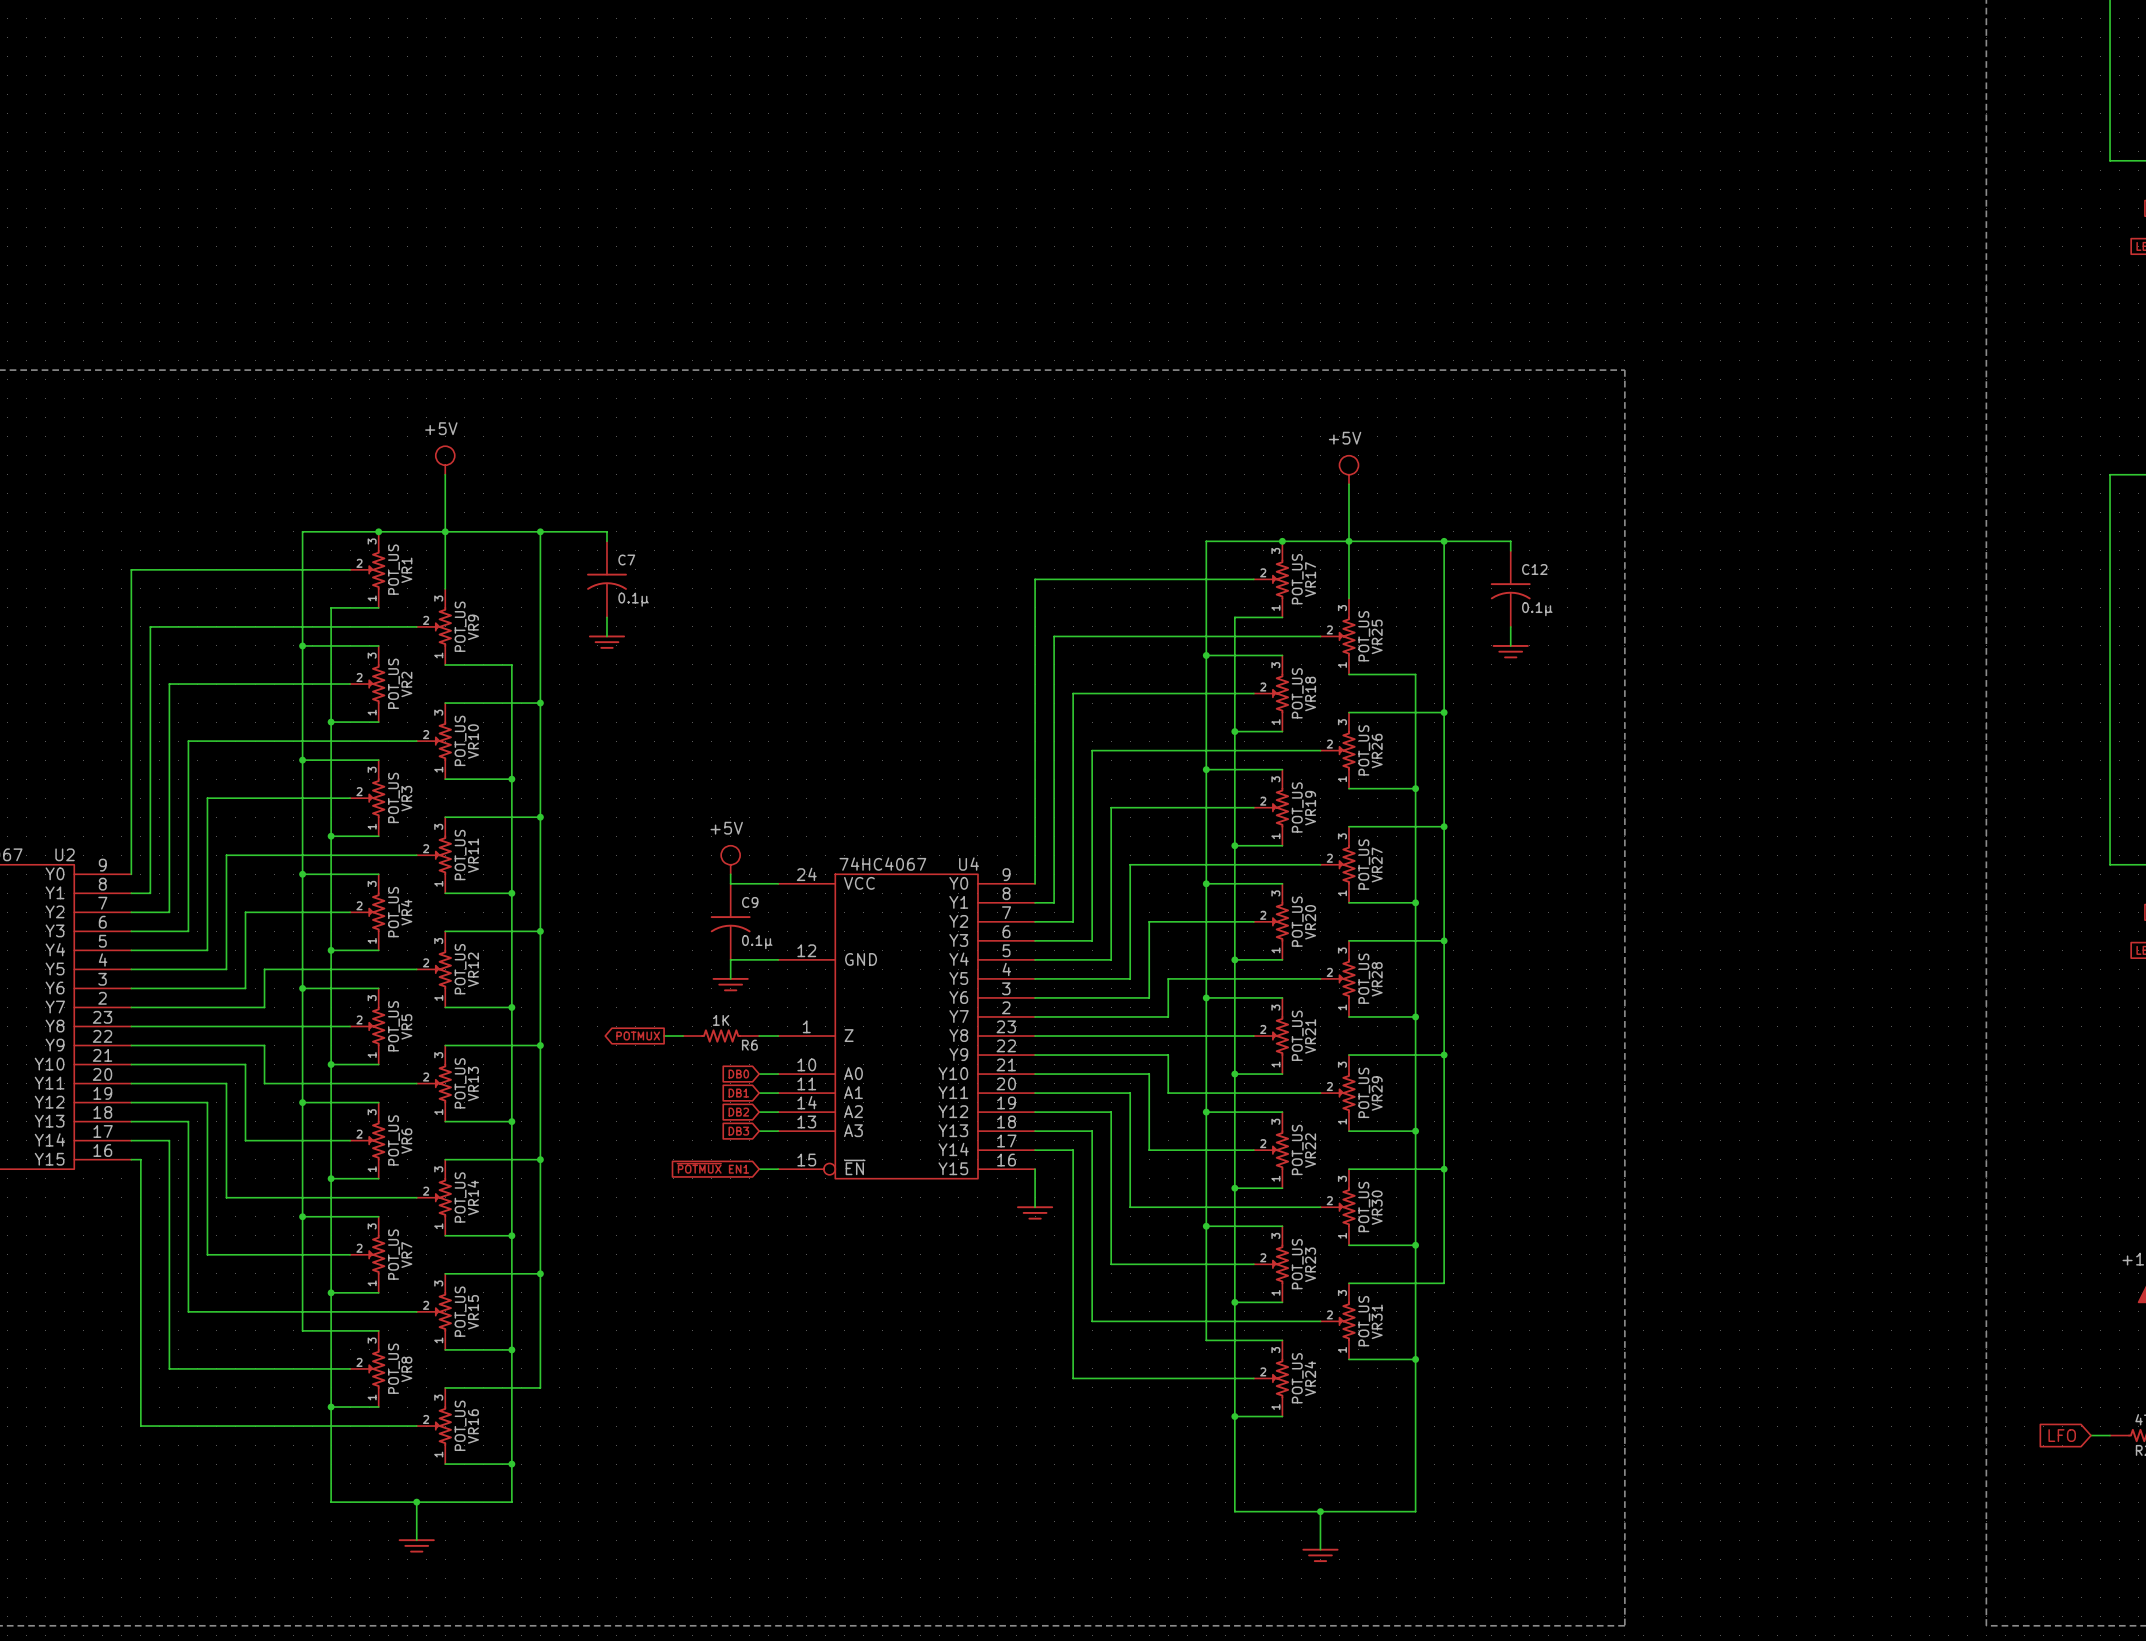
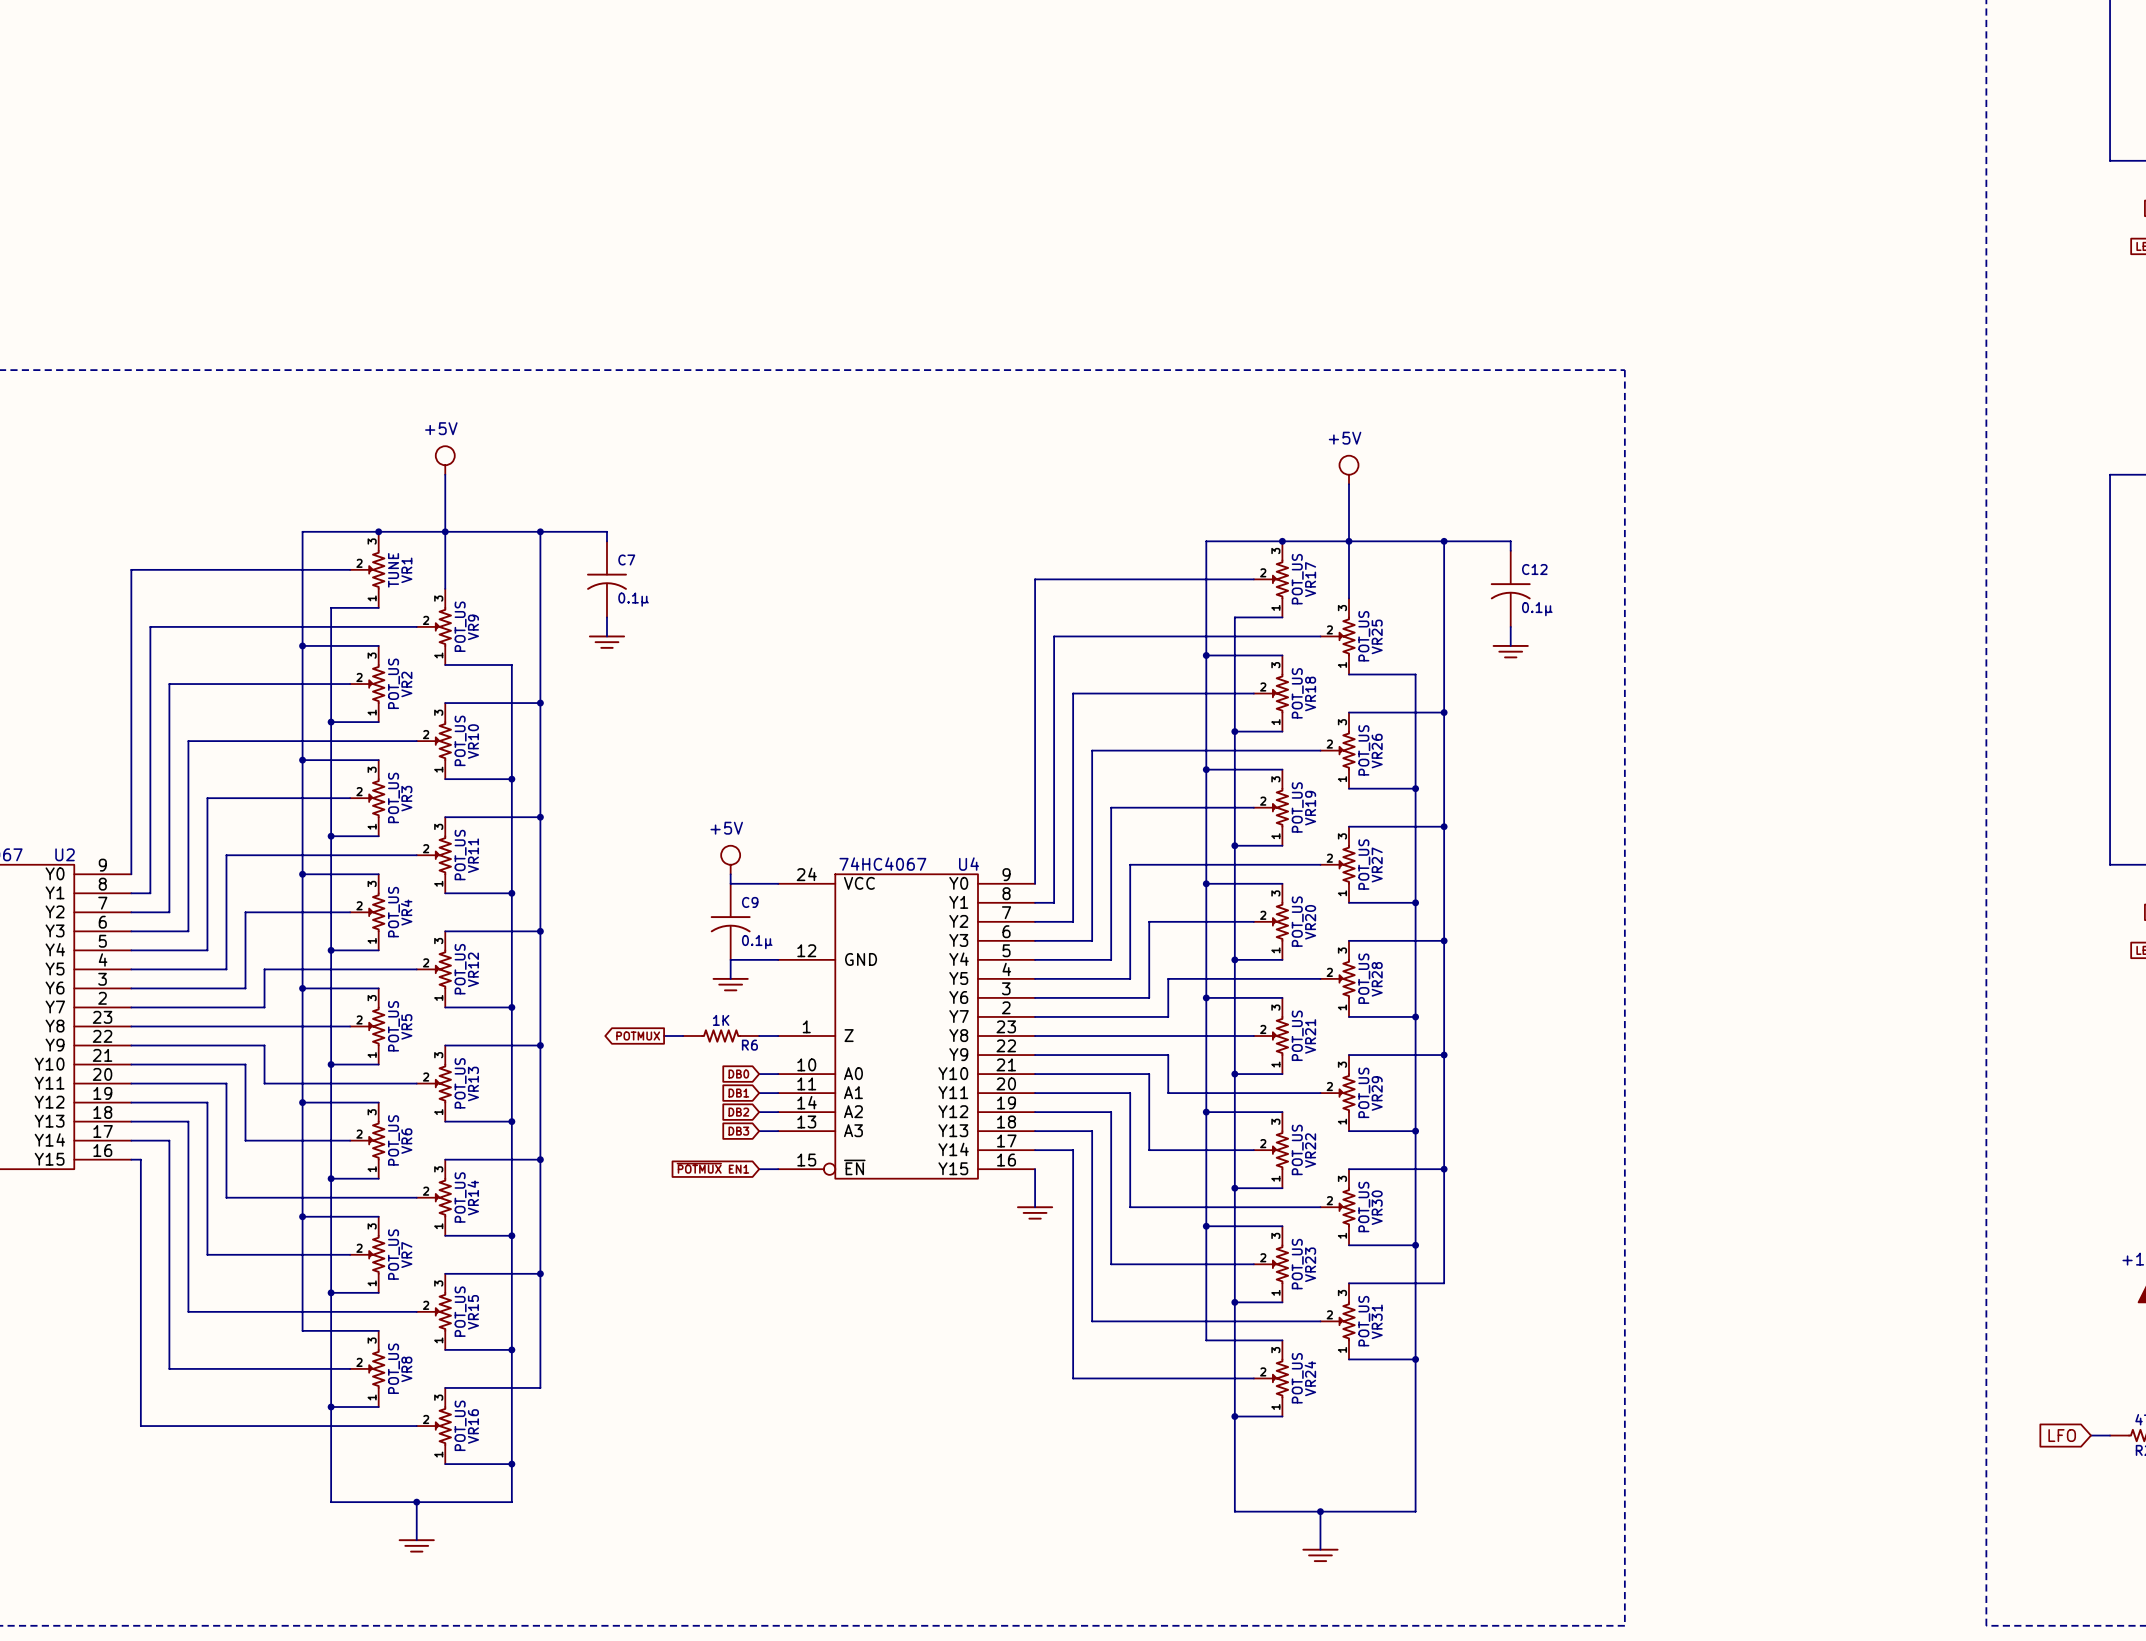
VR1 value: POT_US (394, 569) -> TUNE (393, 570)

